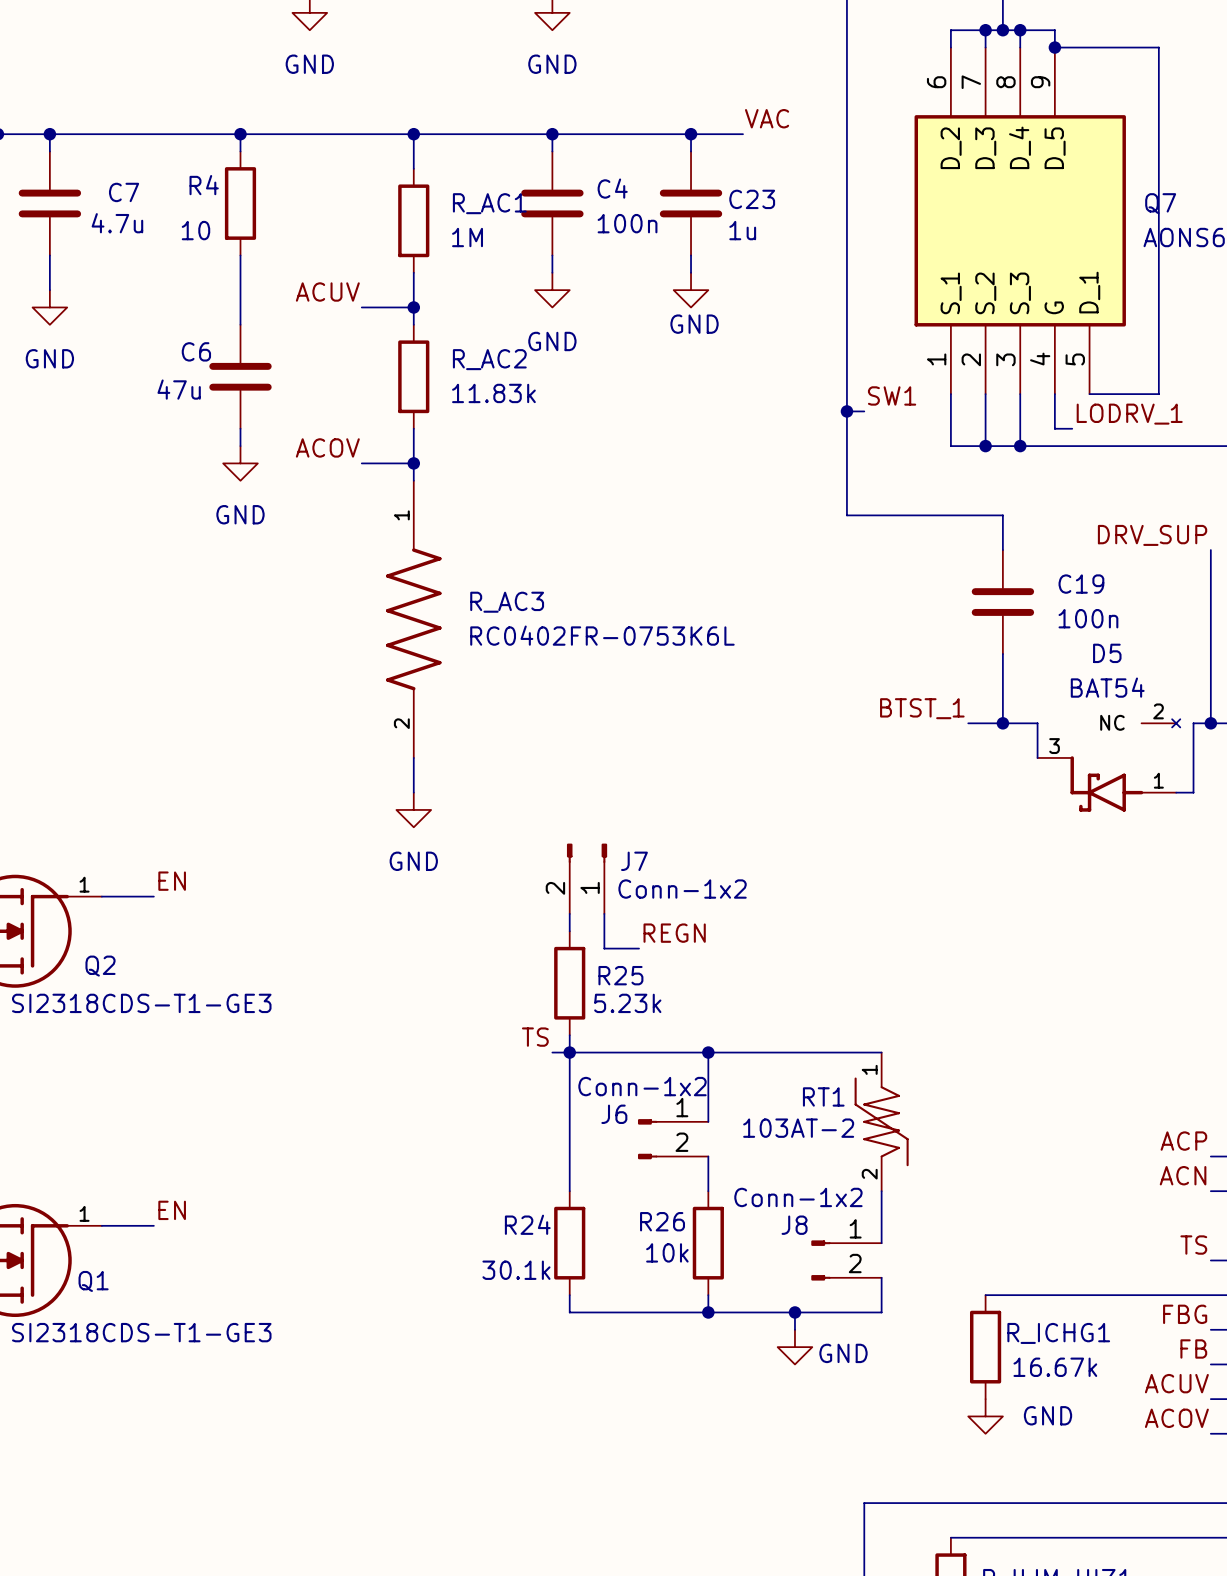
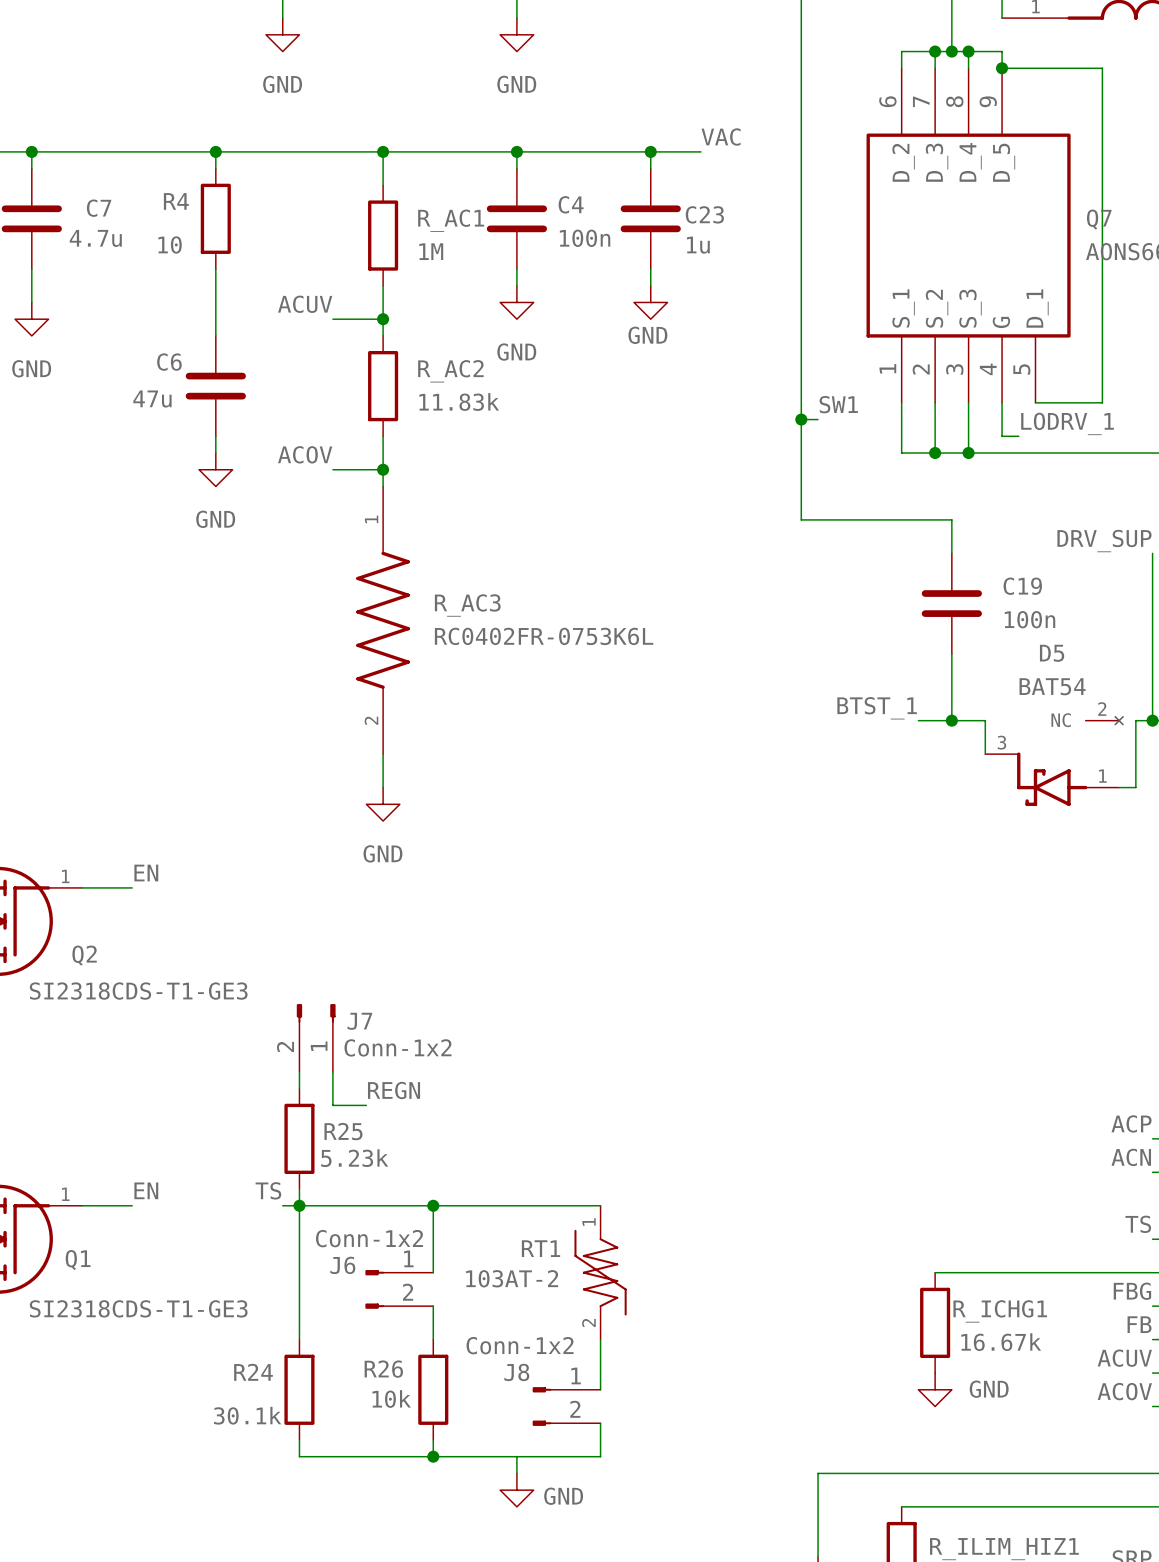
J7 position: (587, 878) -> (316, 1037)
wire: (569, 913) (569, 931) -> (299, 1071) (299, 1088)
wire: (604, 913) (604, 948) (639, 948) -> (332, 1071) (332, 1105) (366, 1105)
label position: REGN (674, 933) -> REGN (394, 1090)
R25 position: (569, 983) -> (299, 1138)
wire: (569, 1035) (569, 1191) -> (299, 1189) (299, 1339)
label position: TS (535, 1037) -> TS (268, 1190)
wire: (552, 1052) (881, 1052) -> (282, 1205) (600, 1205)
junction: (569, 1052) -> none
wire: (708, 1052) (708, 1121) -> (433, 1205) (433, 1272)
junction: (708, 1052) -> none
RT1 position: (881, 1121) -> (600, 1272)
J6 position: (673, 1139) -> (399, 1289)
wire: (708, 1156) (708, 1191) -> (433, 1306) (433, 1339)
wire: (881, 1191) (881, 1243) -> (600, 1339) (600, 1389)
junction: none -> (299, 1205)
junction: none -> (433, 1205)
R24 position: (569, 1243) -> (299, 1389)
R26 position: (708, 1243) -> (433, 1389)
J8 position: (846, 1260) -> (566, 1406)
wire: (881, 1277) (881, 1312) (569, 1312) (569, 1295) -> (600, 1423) (600, 1456) (299, 1456) (299, 1439)
wire: (708, 1295) (708, 1312) -> (433, 1439) (433, 1456)
junction: (708, 1312) -> none
wire: (794, 1312) (794, 1329) -> (516, 1456) (516, 1473)
junction: (794, 1312) -> none
power symbol position: GND (794, 1347) -> GND (516, 1490)
junction: none -> (433, 1456)

